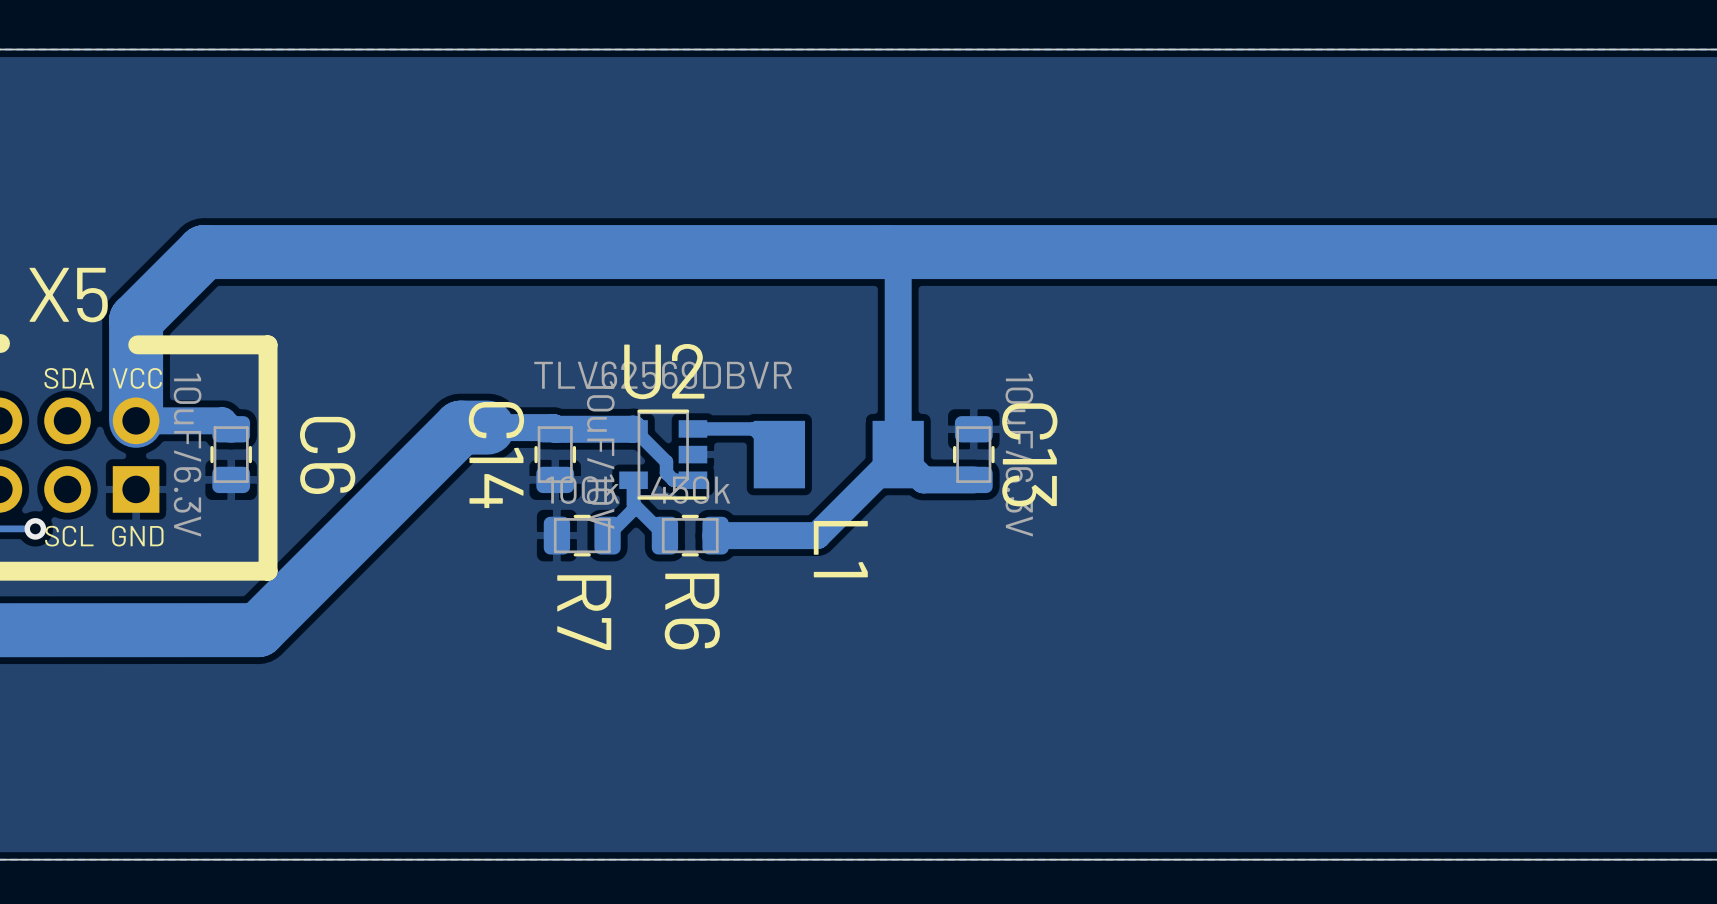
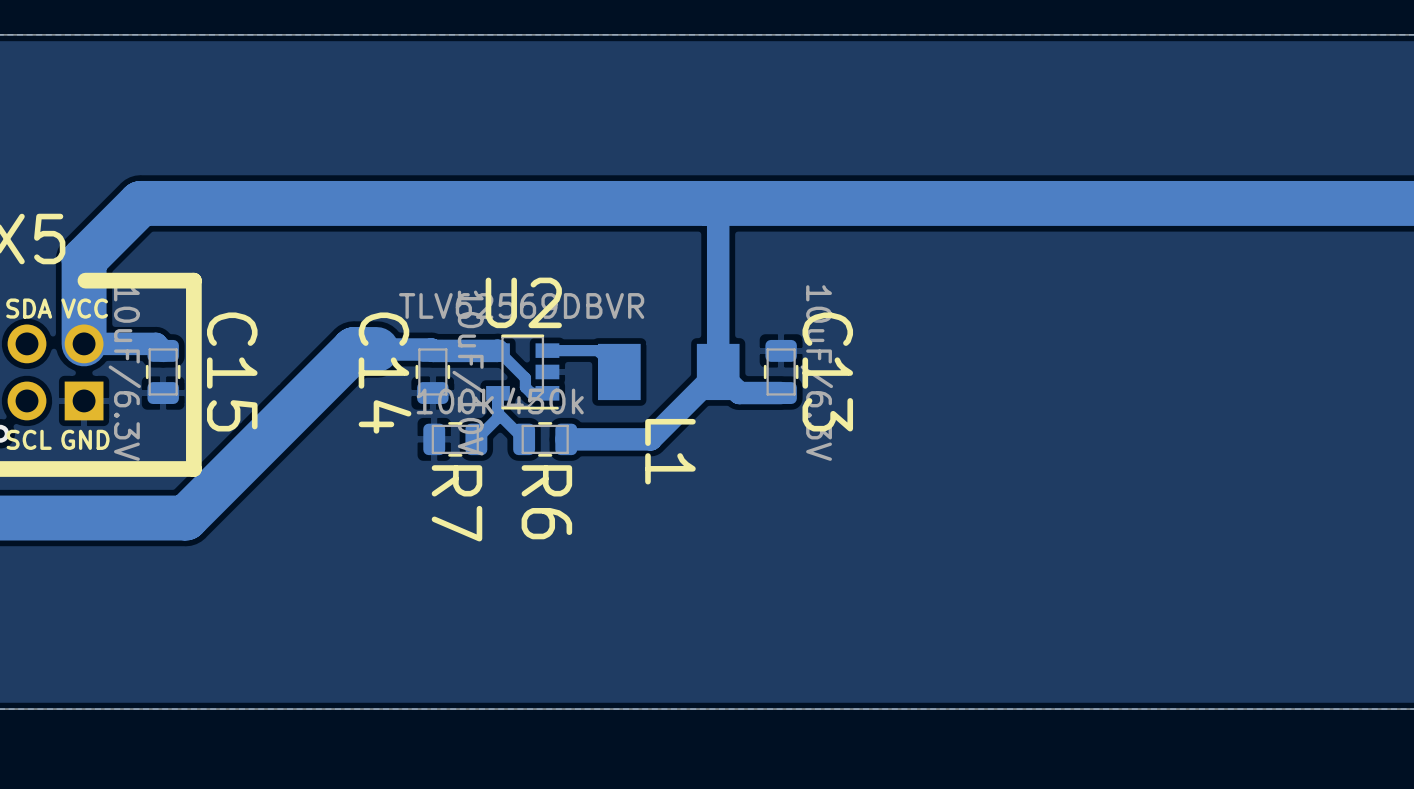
C6 name: C6 (327, 455) -> C15 (232, 371)

